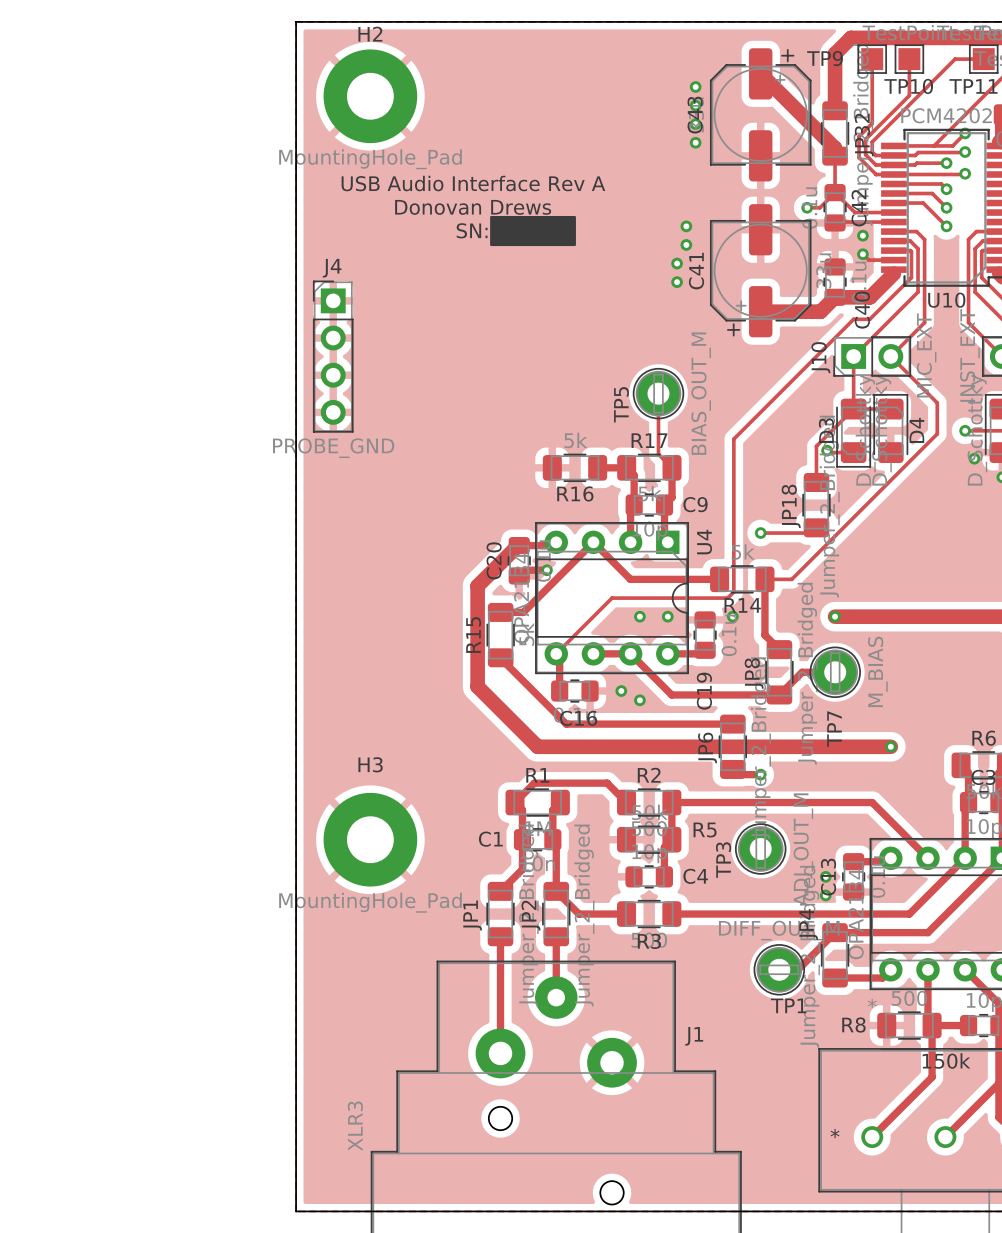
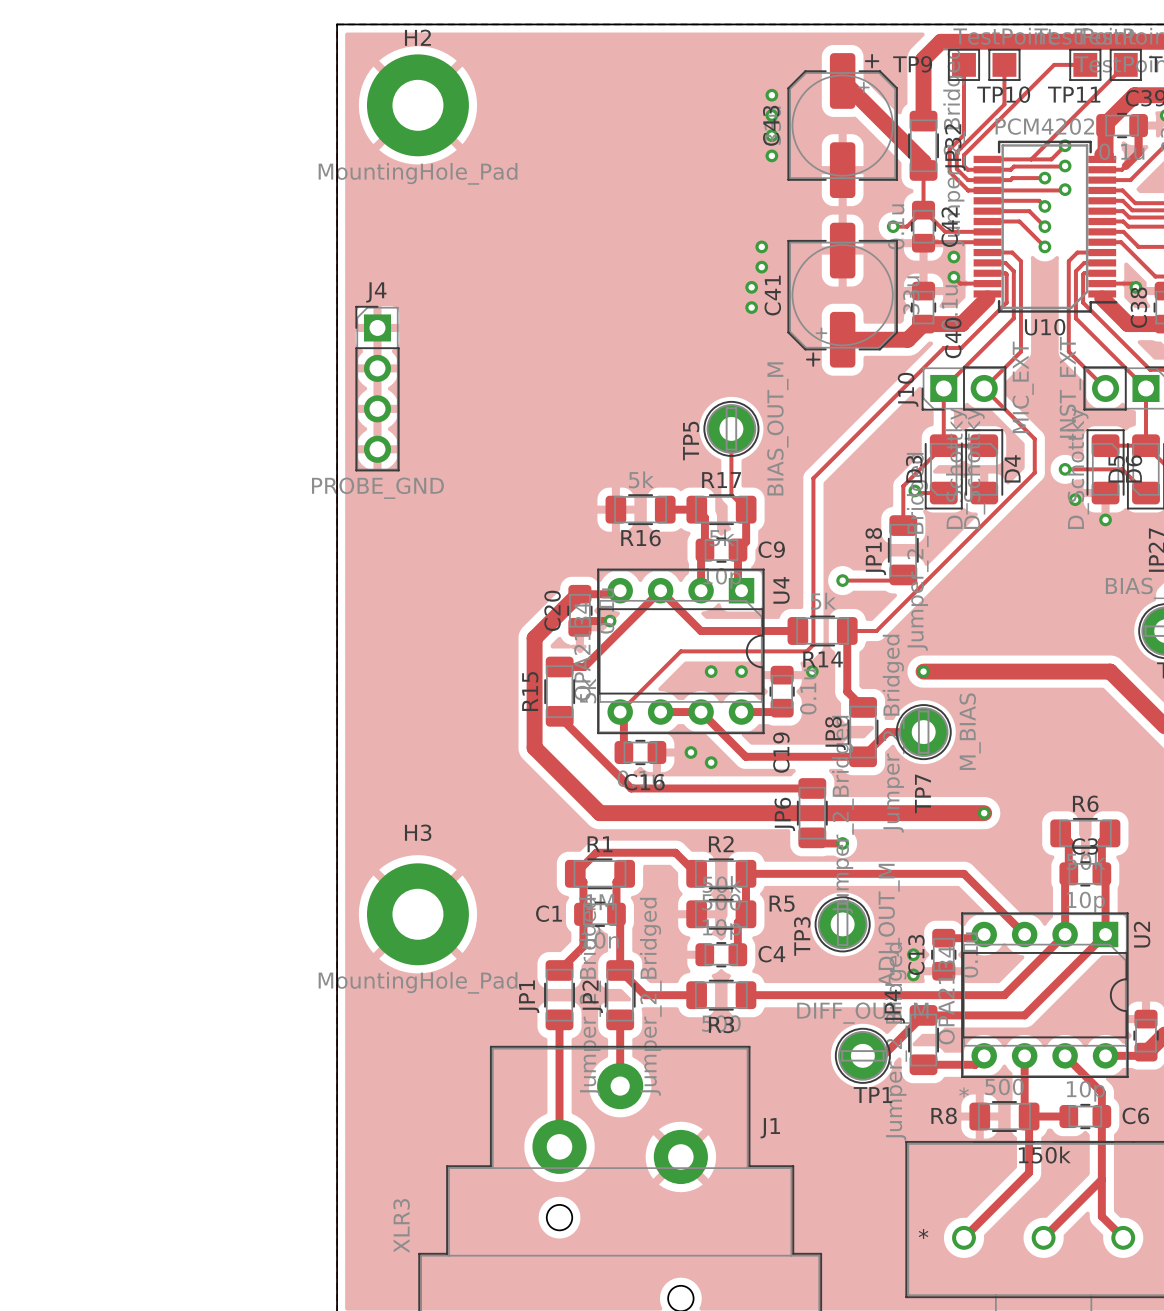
text: USB Audio Interface Rev A (473, 183) -> none
text: Donovan Drews (473, 207) -> none
drawing: [490, 215, 576, 247] -> none
text: SN: (472, 230) -> none

